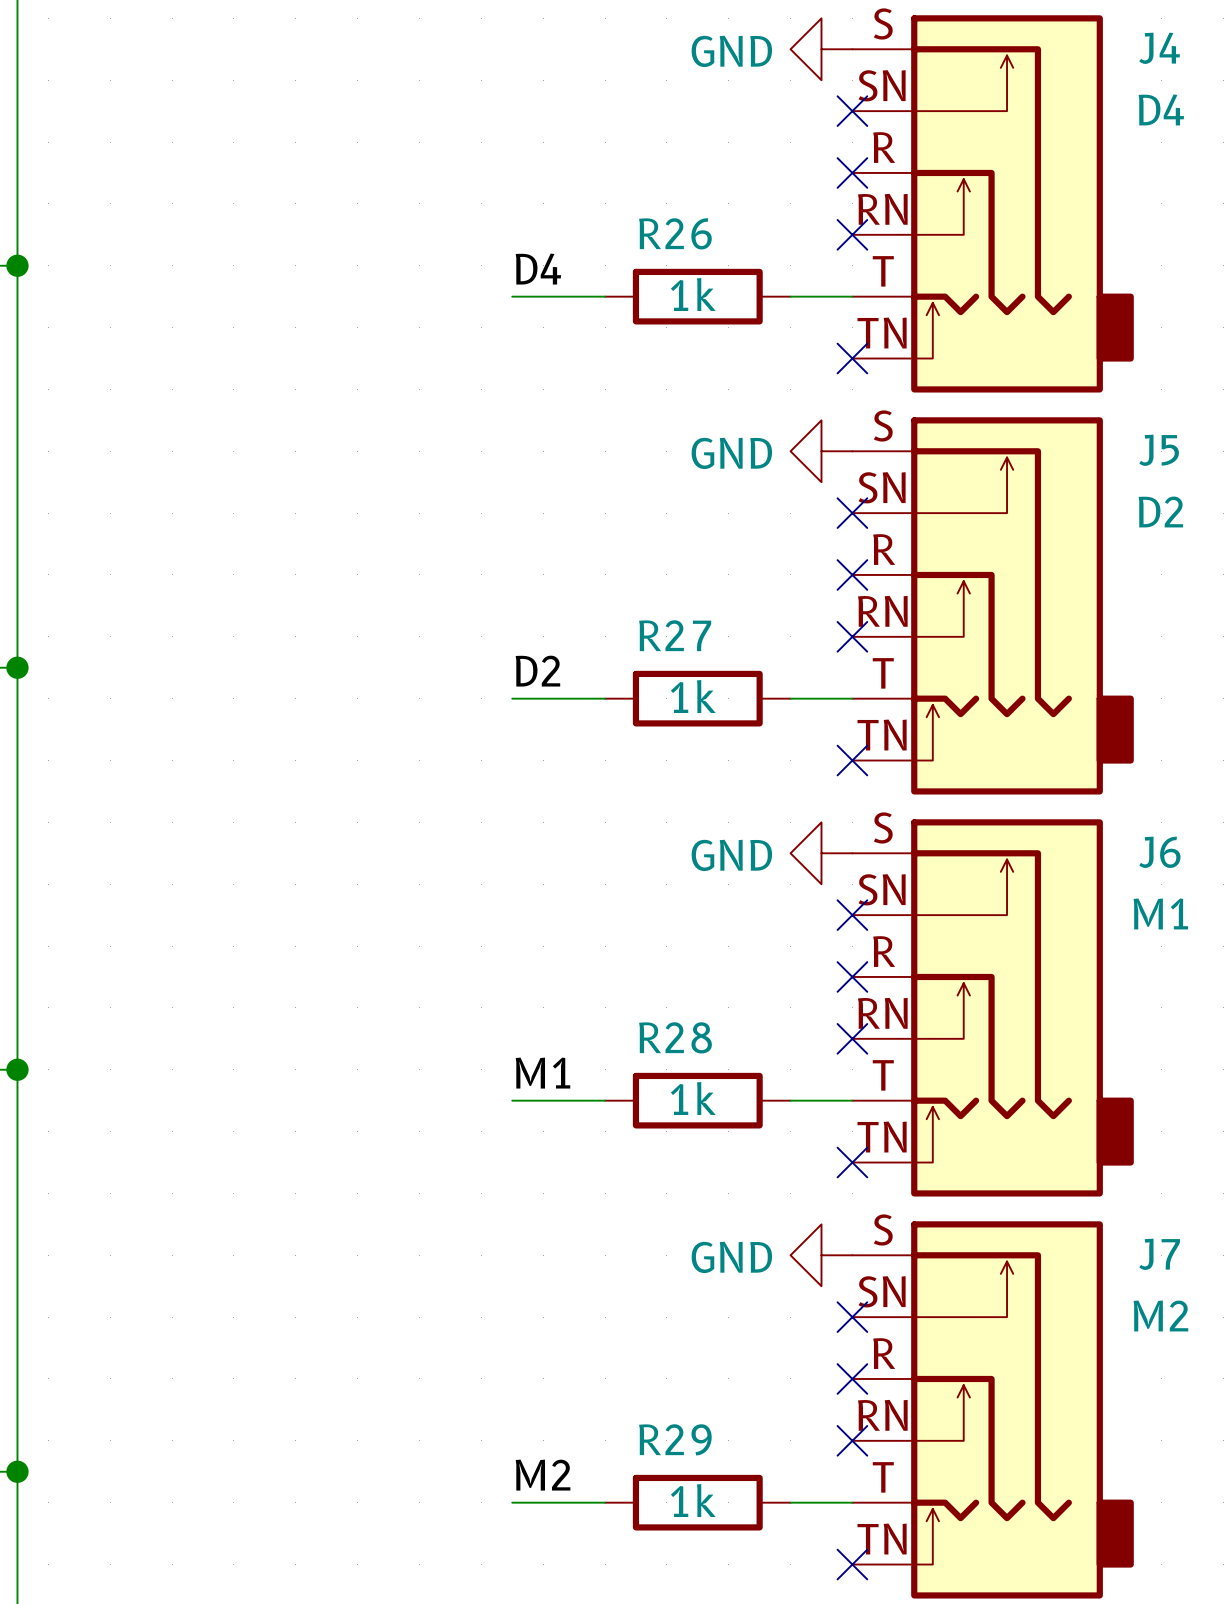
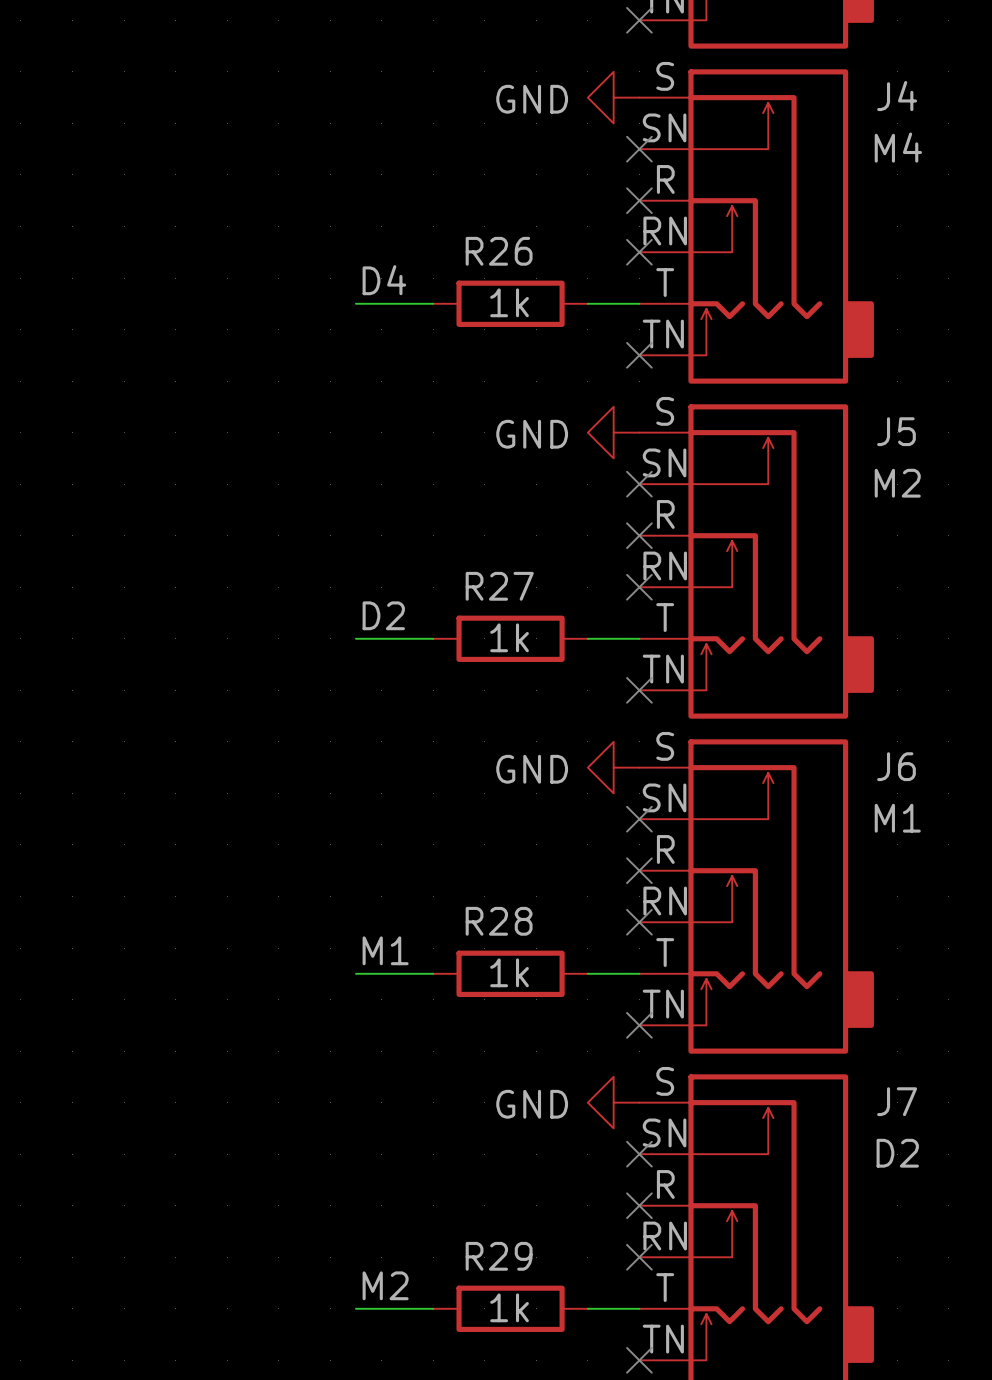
J4 value: D4 (1161, 109) -> M4 (898, 147)
J5 value: D2 (1160, 512) -> M2 (897, 483)
J7 value: M2 (1160, 1315) -> D2 (897, 1153)

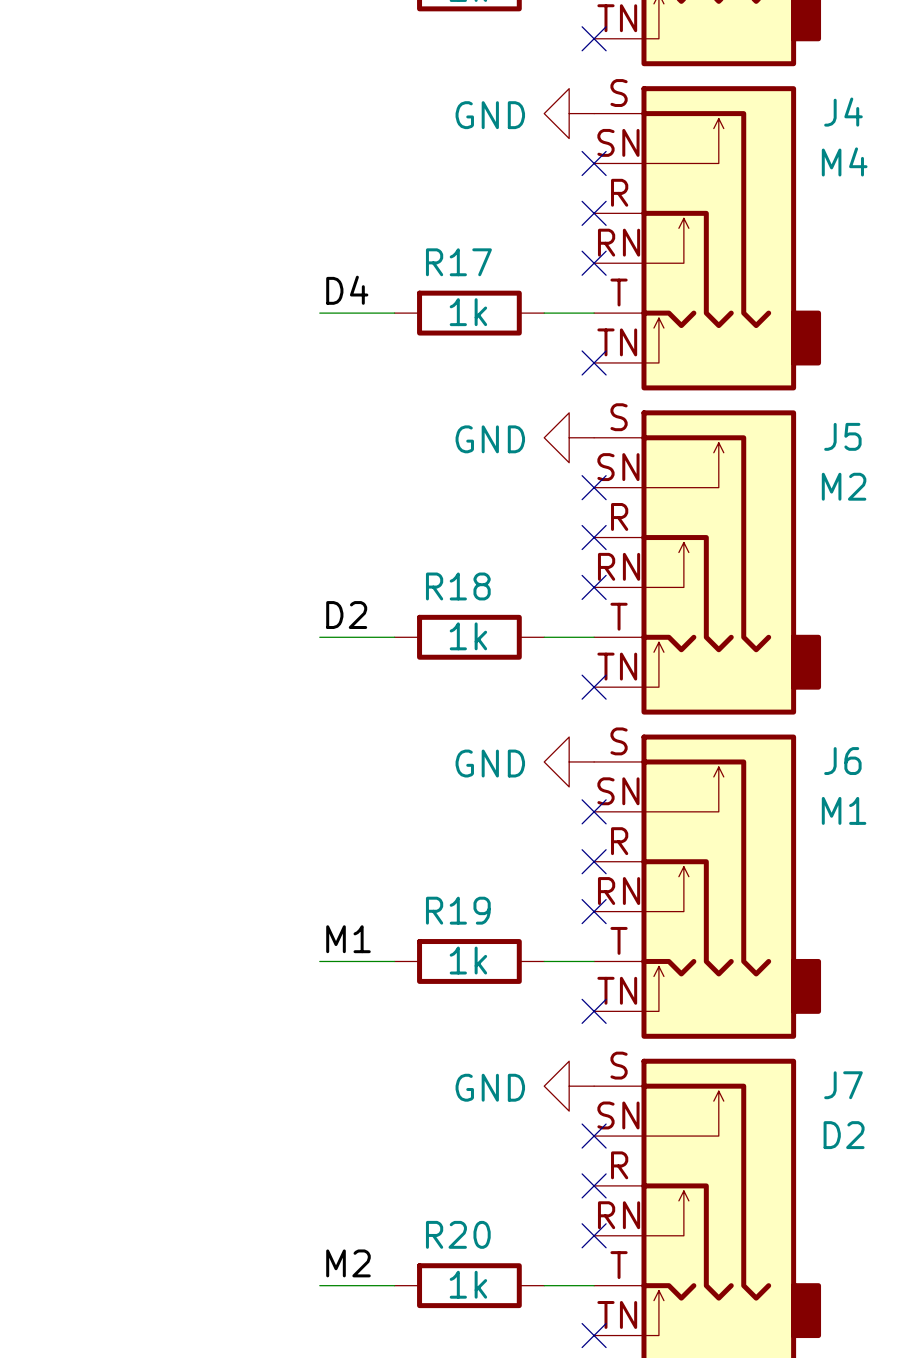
R26 name: R26 (499, 251) -> R17 (458, 262)
R27 name: R27 (499, 586) -> R18 (458, 586)
R28 name: R28 (499, 921) -> R19 (458, 910)
R29 name: R29 (499, 1256) -> R20 (458, 1234)

